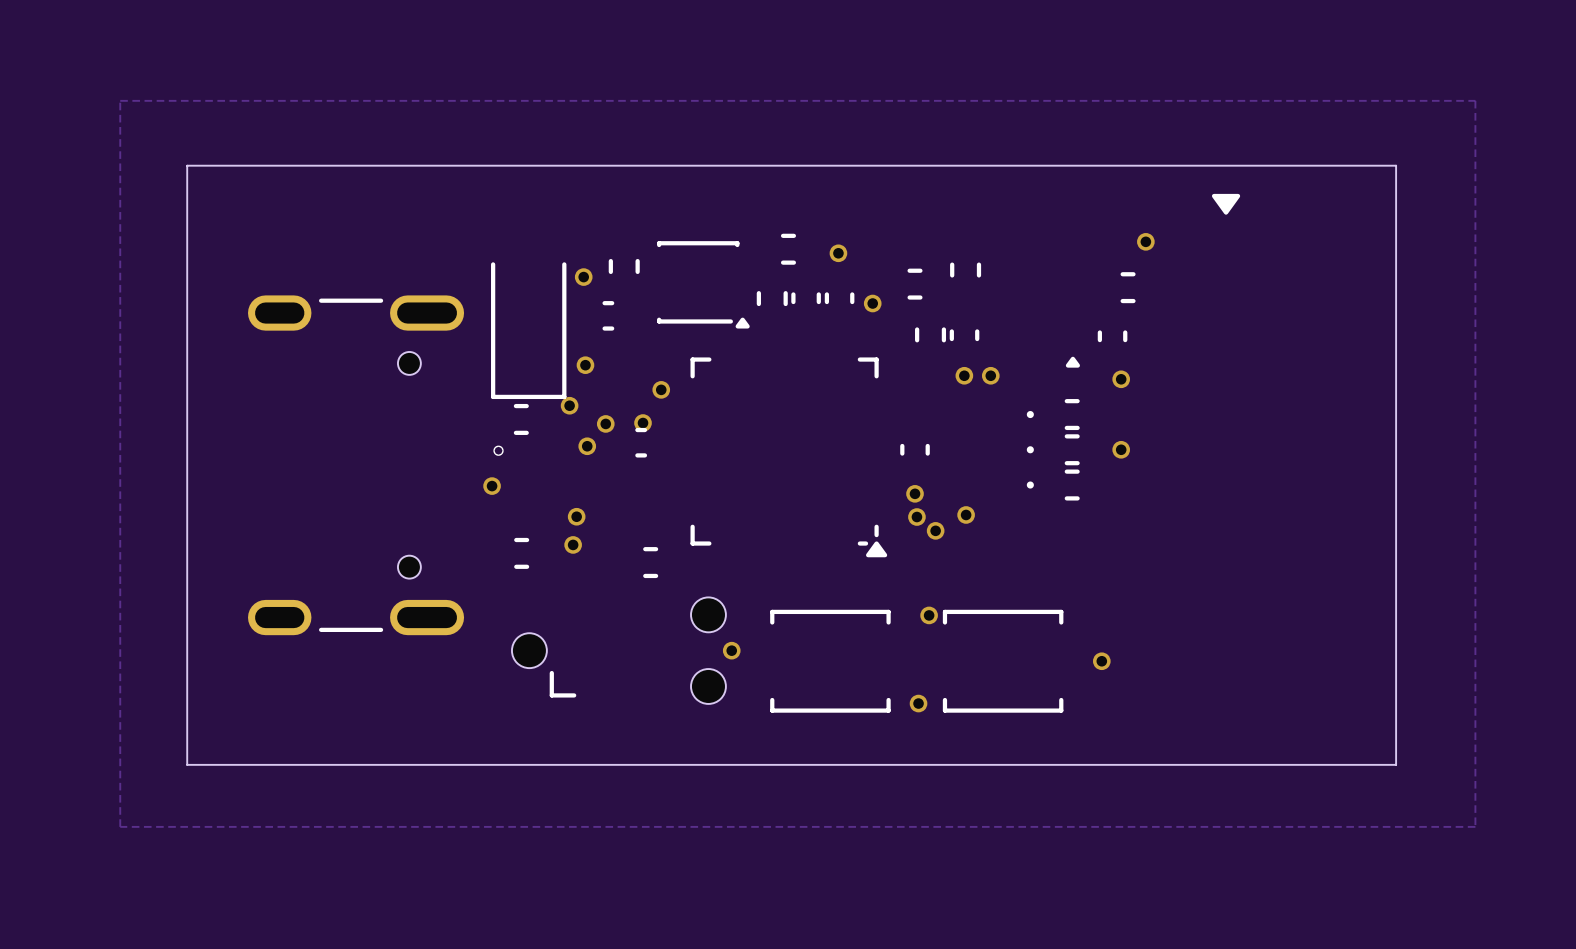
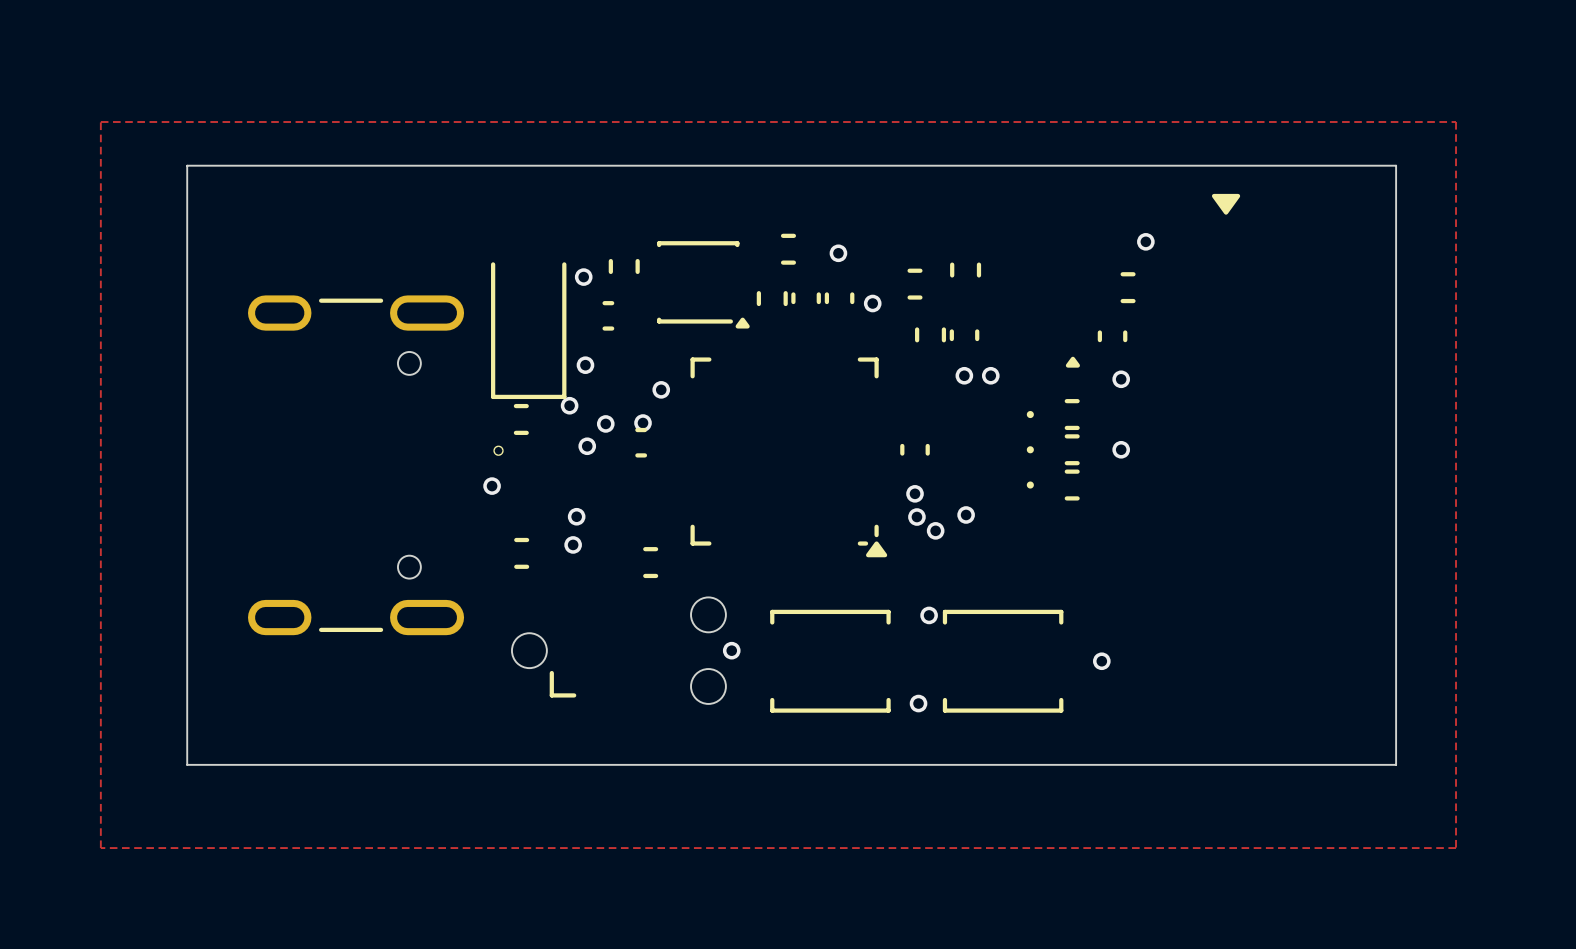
zone outline: (120, 100) (120, 826) (1475, 826) (1475, 100) (120, 100) -> (100, 122) (100, 848) (1456, 848) (1456, 122) (100, 122)

